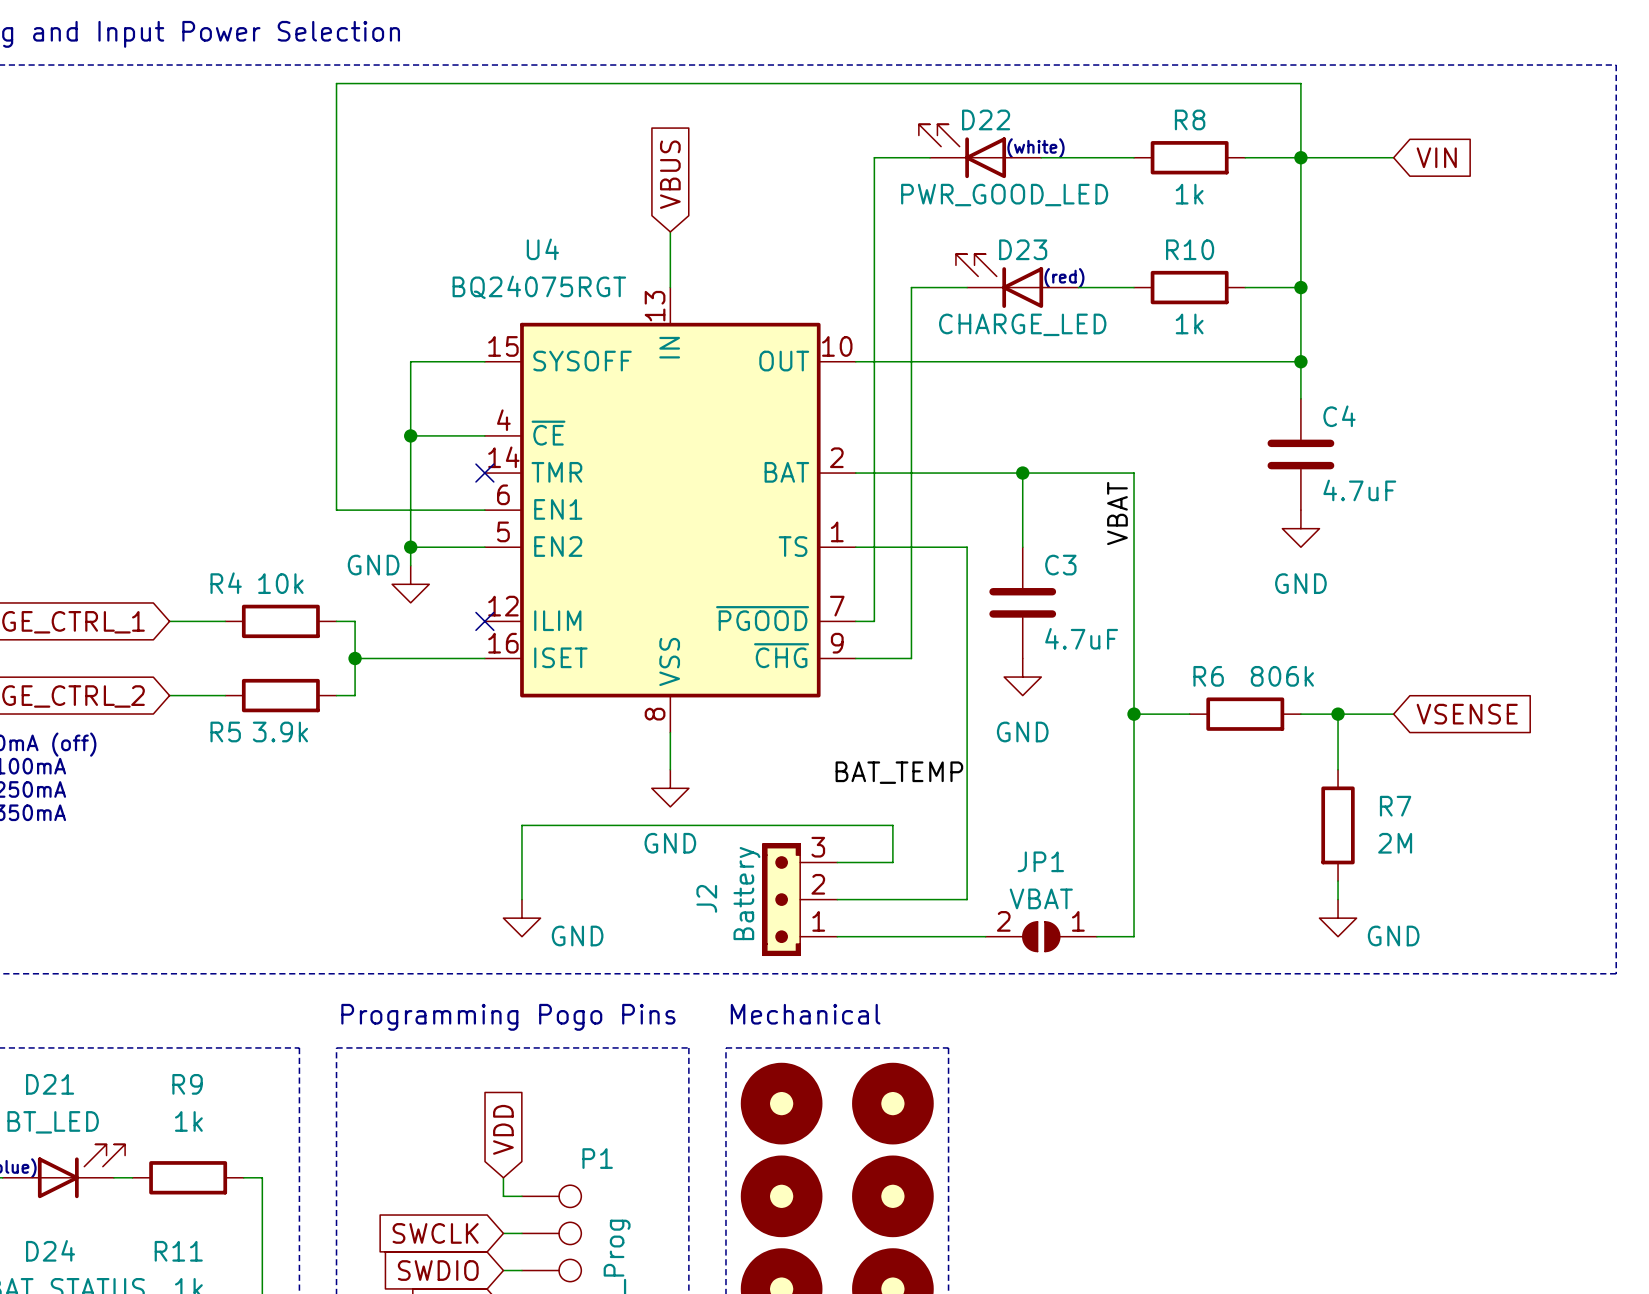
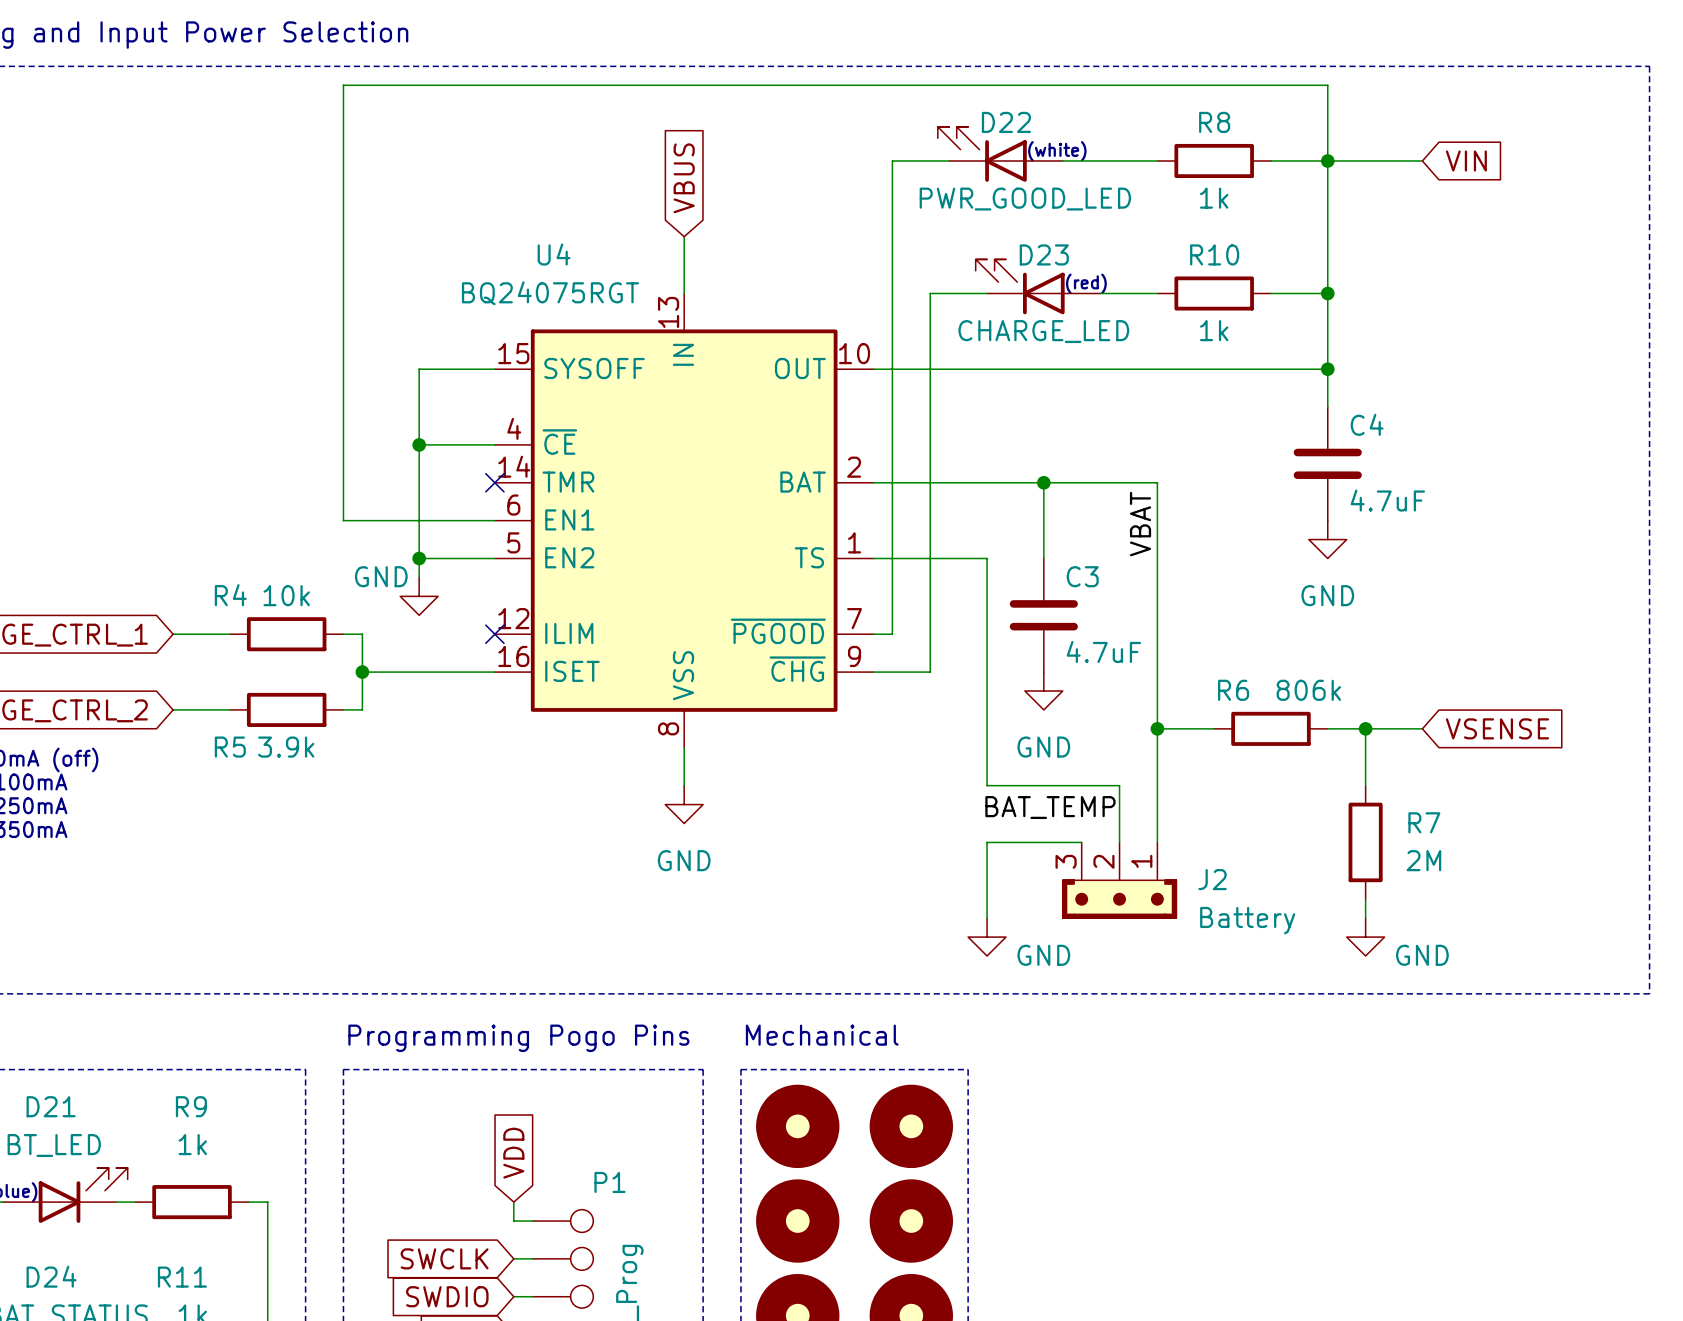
wire: (967, 769) (967, 825) -> (1081, 842) (987, 842)
wire: none -> (987, 785) (1119, 785) (1119, 842)
label position: BAT_TEMP (899, 772) -> BAT_TEMP (1050, 807)
wire: (1134, 825) (1134, 936) (1096, 936) -> none
wire: (837, 862) (892, 862) (892, 825) (521, 825) (521, 899) -> none
J2 value position: Battery (746, 893) -> Battery (1247, 920)
J2 name position: J2 (706, 898) -> J2 (1212, 879)
J2 rotation: 0° (781, 899) -> 90° counterclockwise (1119, 899)
J2 position: (800, 899) -> (1119, 880)
wire: (837, 899) (967, 899) -> none
power symbol: GND (521, 918) -> none
power symbol: none -> GND (987, 937)
wire: (837, 936) (985, 936) -> none
JP1: VBAT (1041, 936) -> none

